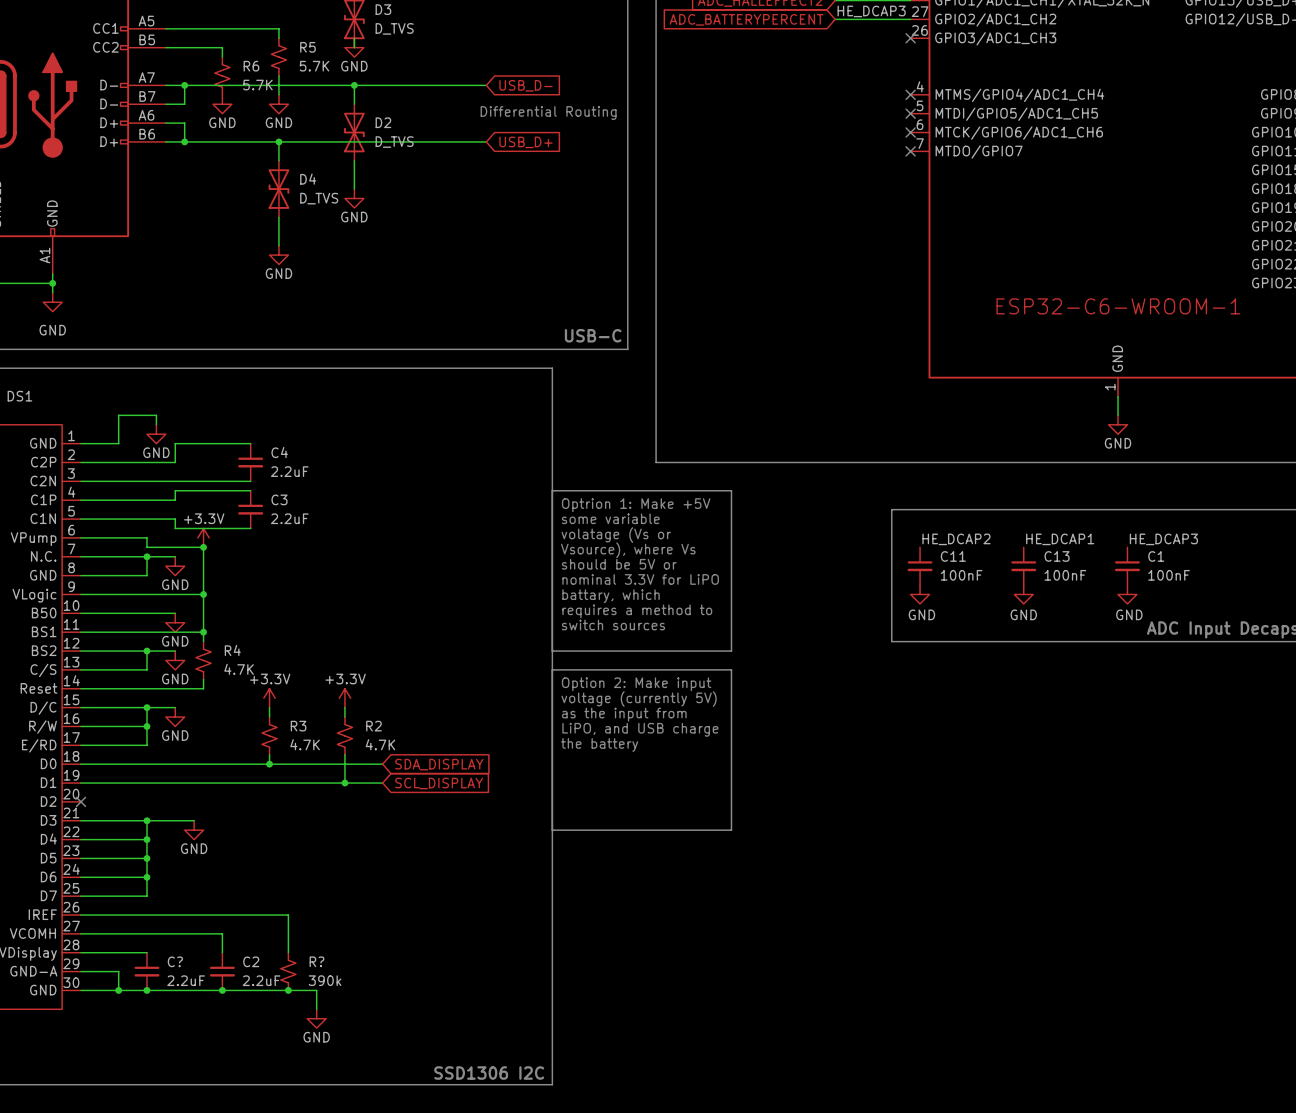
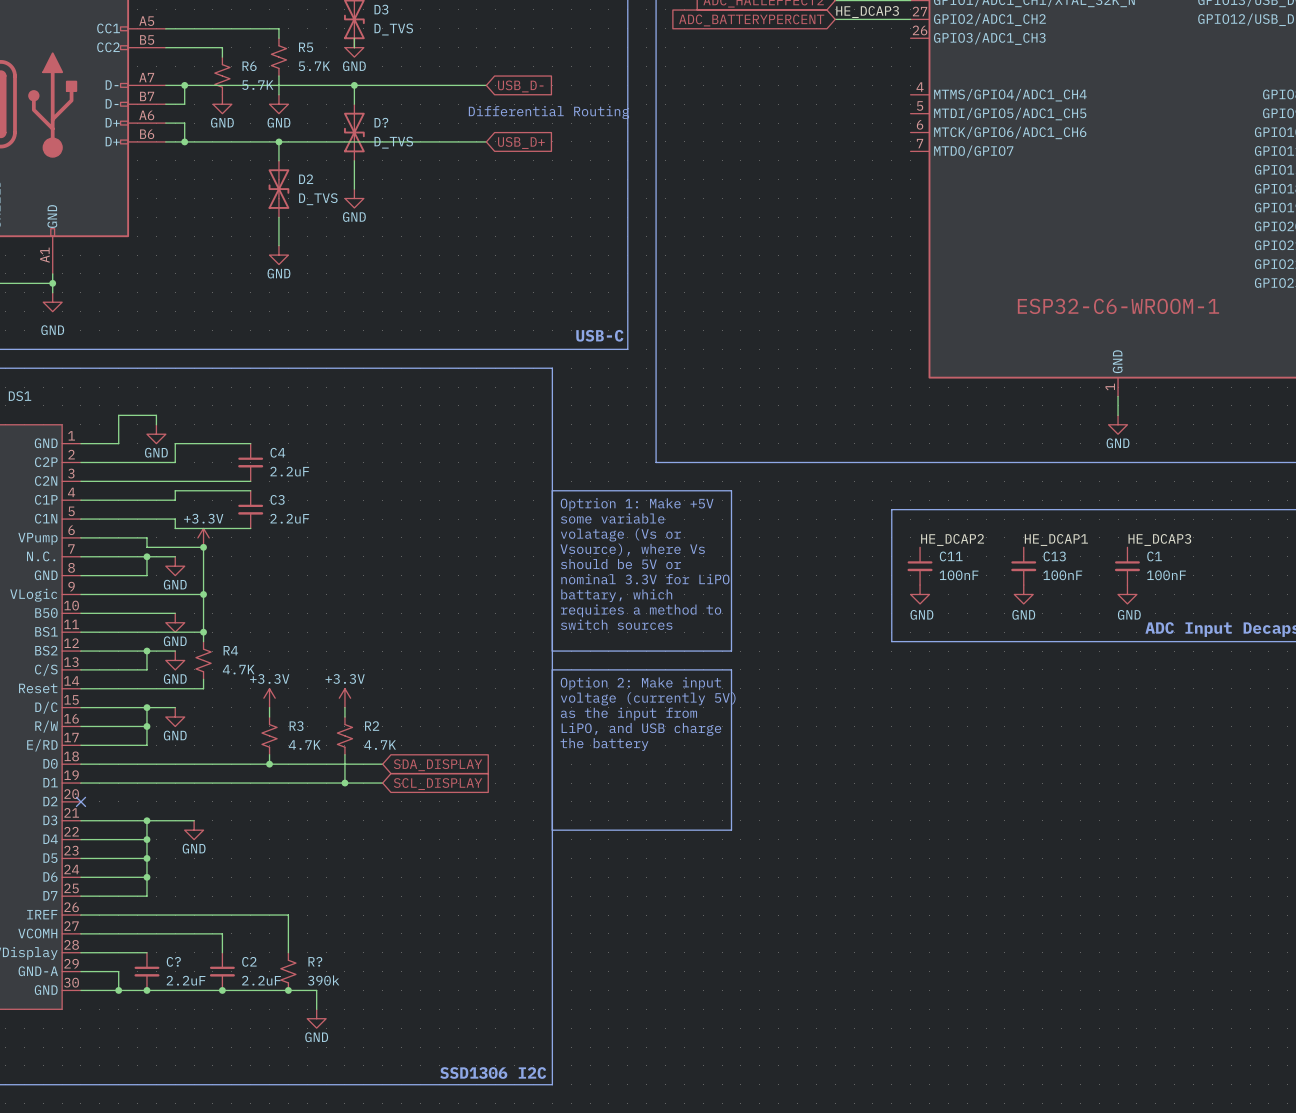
no-connect mark: (910, 38) -> none
no-connect mark: (910, 94) -> none
no-connect mark: (910, 113) -> none
D2 name: D2 (383, 122) -> D? (381, 122)
no-connect mark: (910, 132) -> none
no-connect mark: (910, 151) -> none
D4 name: D4 (308, 179) -> D2 (306, 179)

